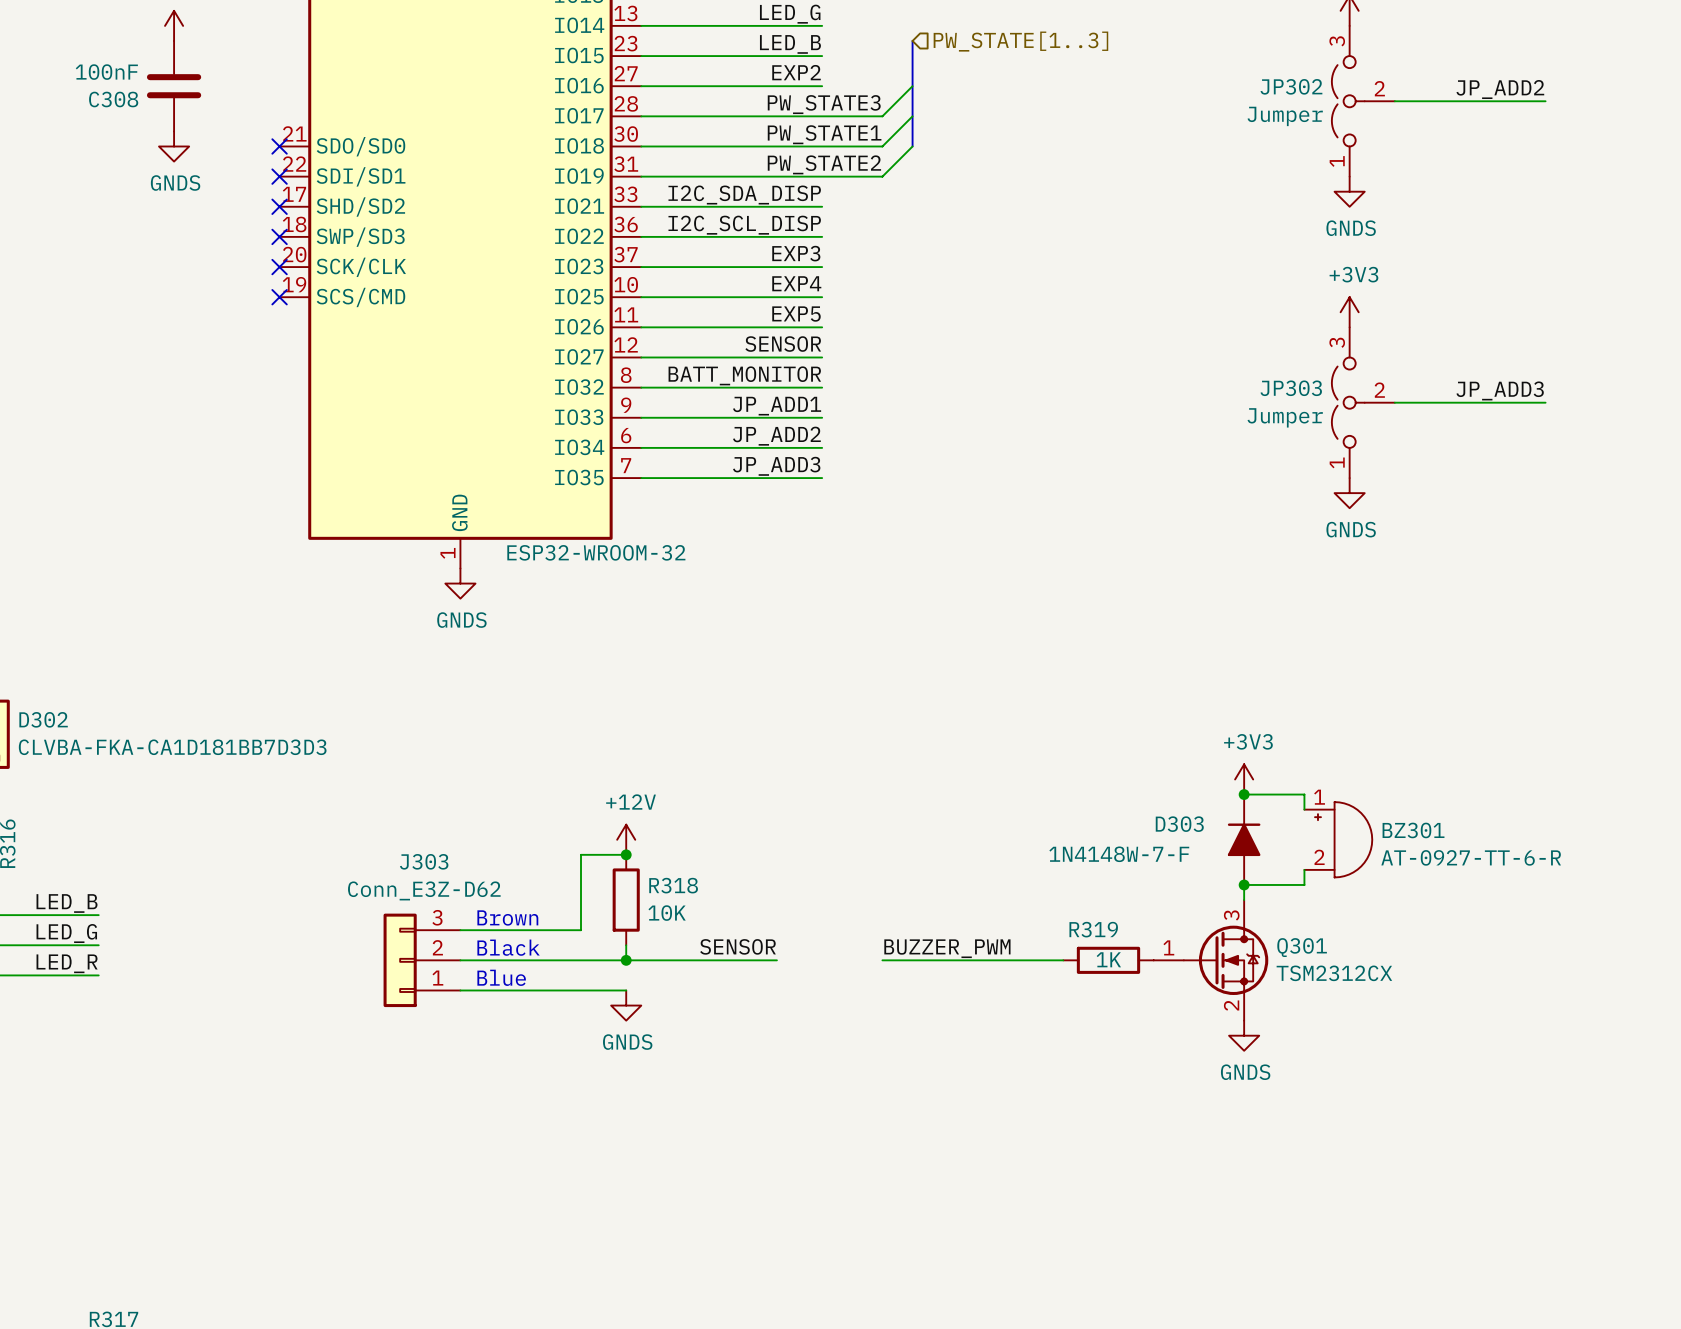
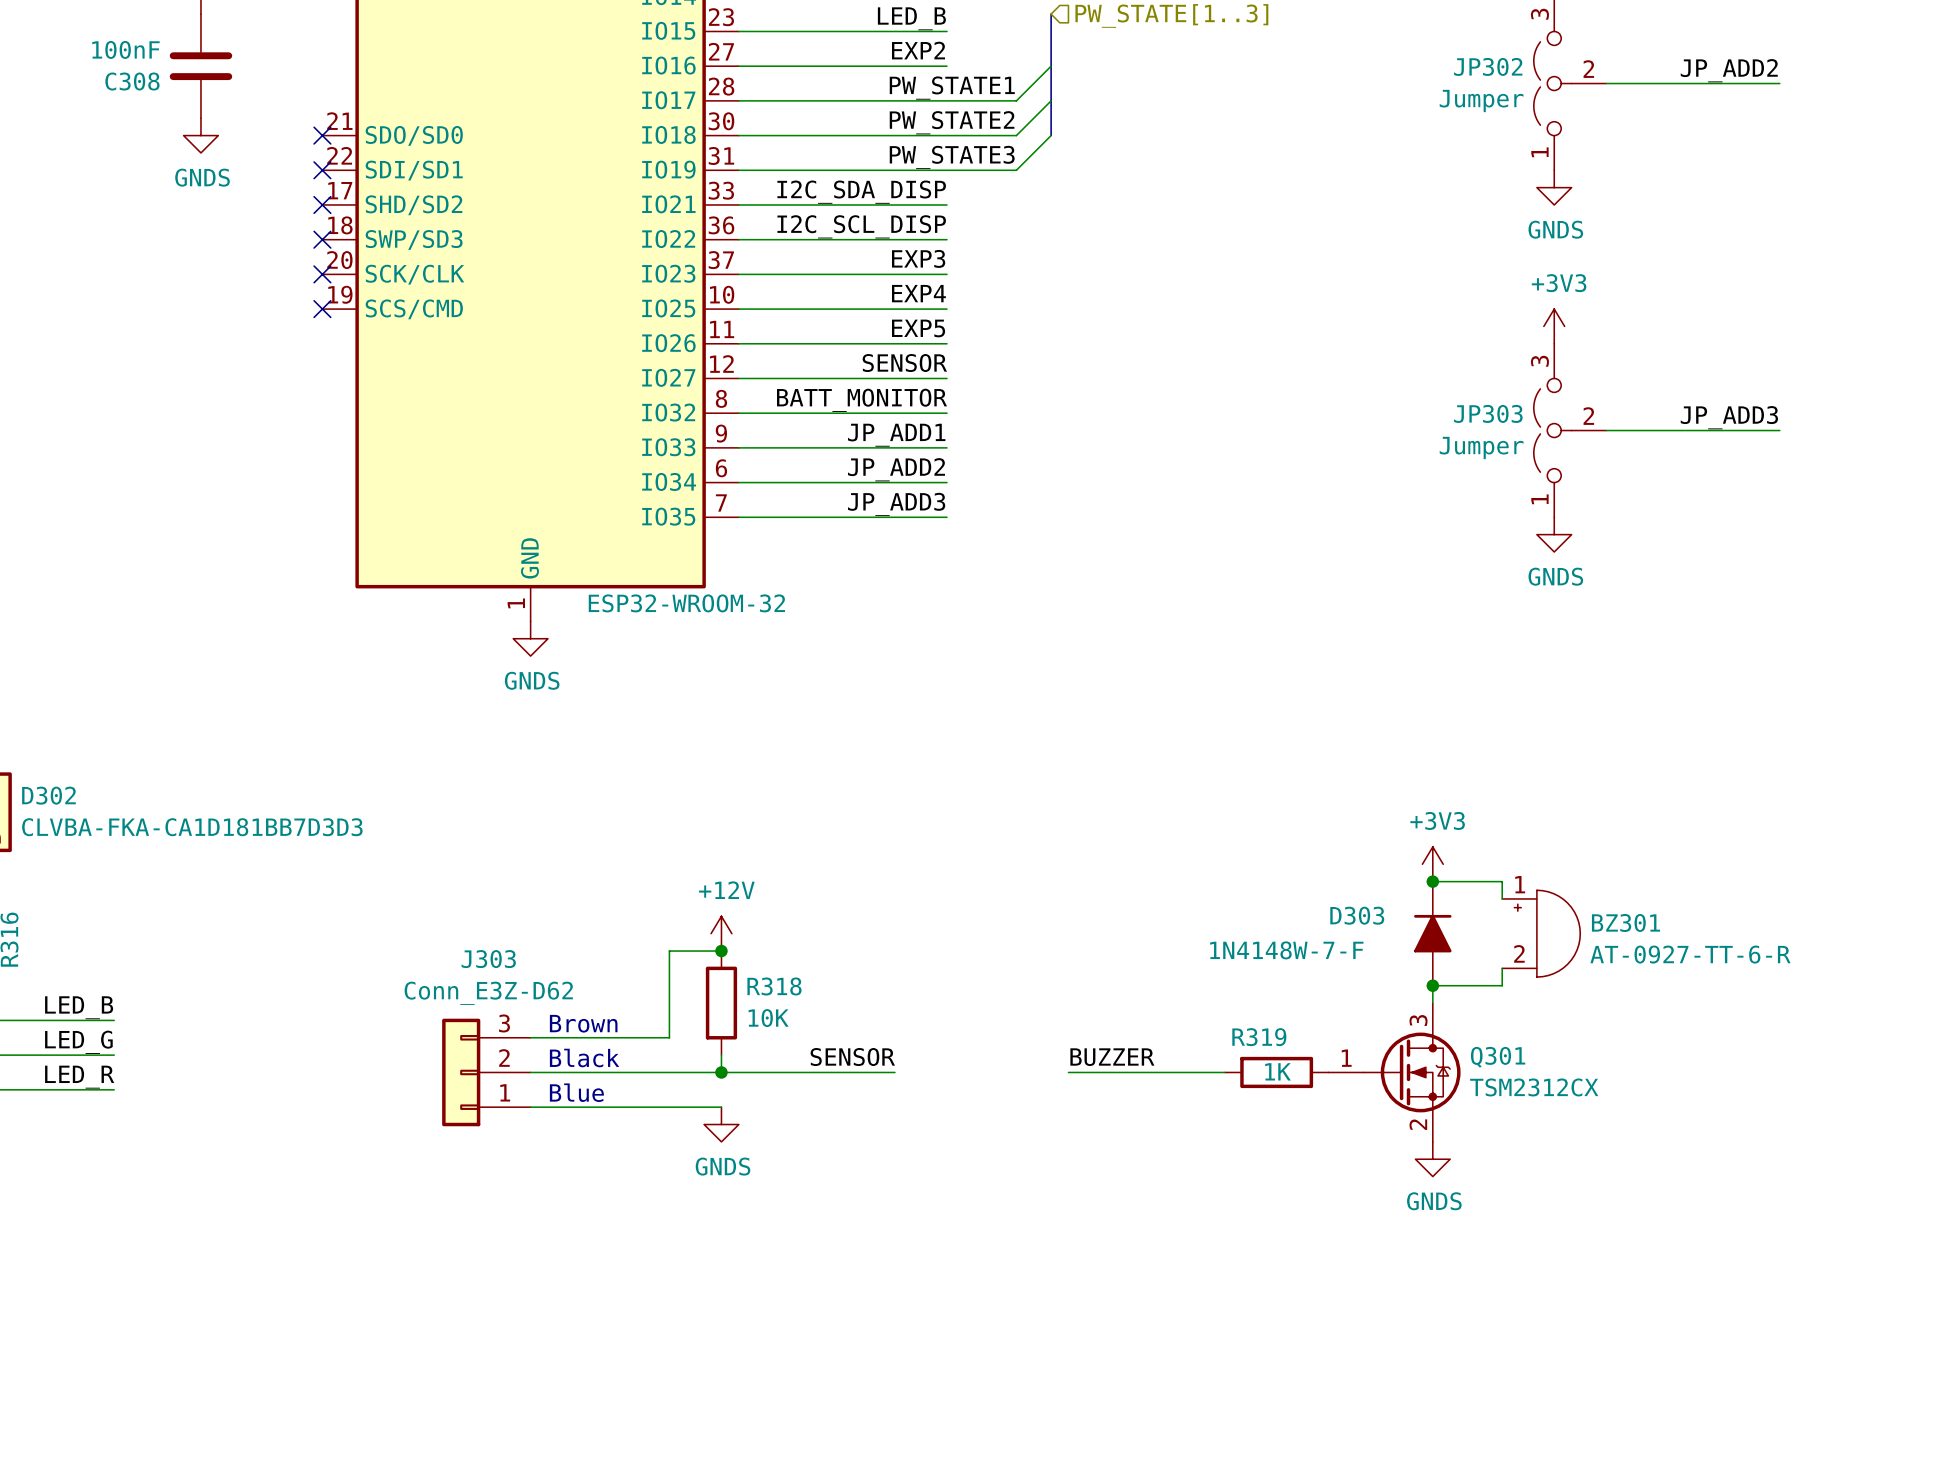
label: PW_STATE3 (824, 104) -> PW_STATE1 (952, 88)
label: PW_STATE1 (824, 134) -> PW_STATE2 (952, 122)
label: PW_STATE2 (824, 164) -> PW_STATE3 (952, 157)
label: BUZZER_PWM (947, 948) -> BUZZER (1112, 1057)
wire: (882, 960) (927, 960) -> none

